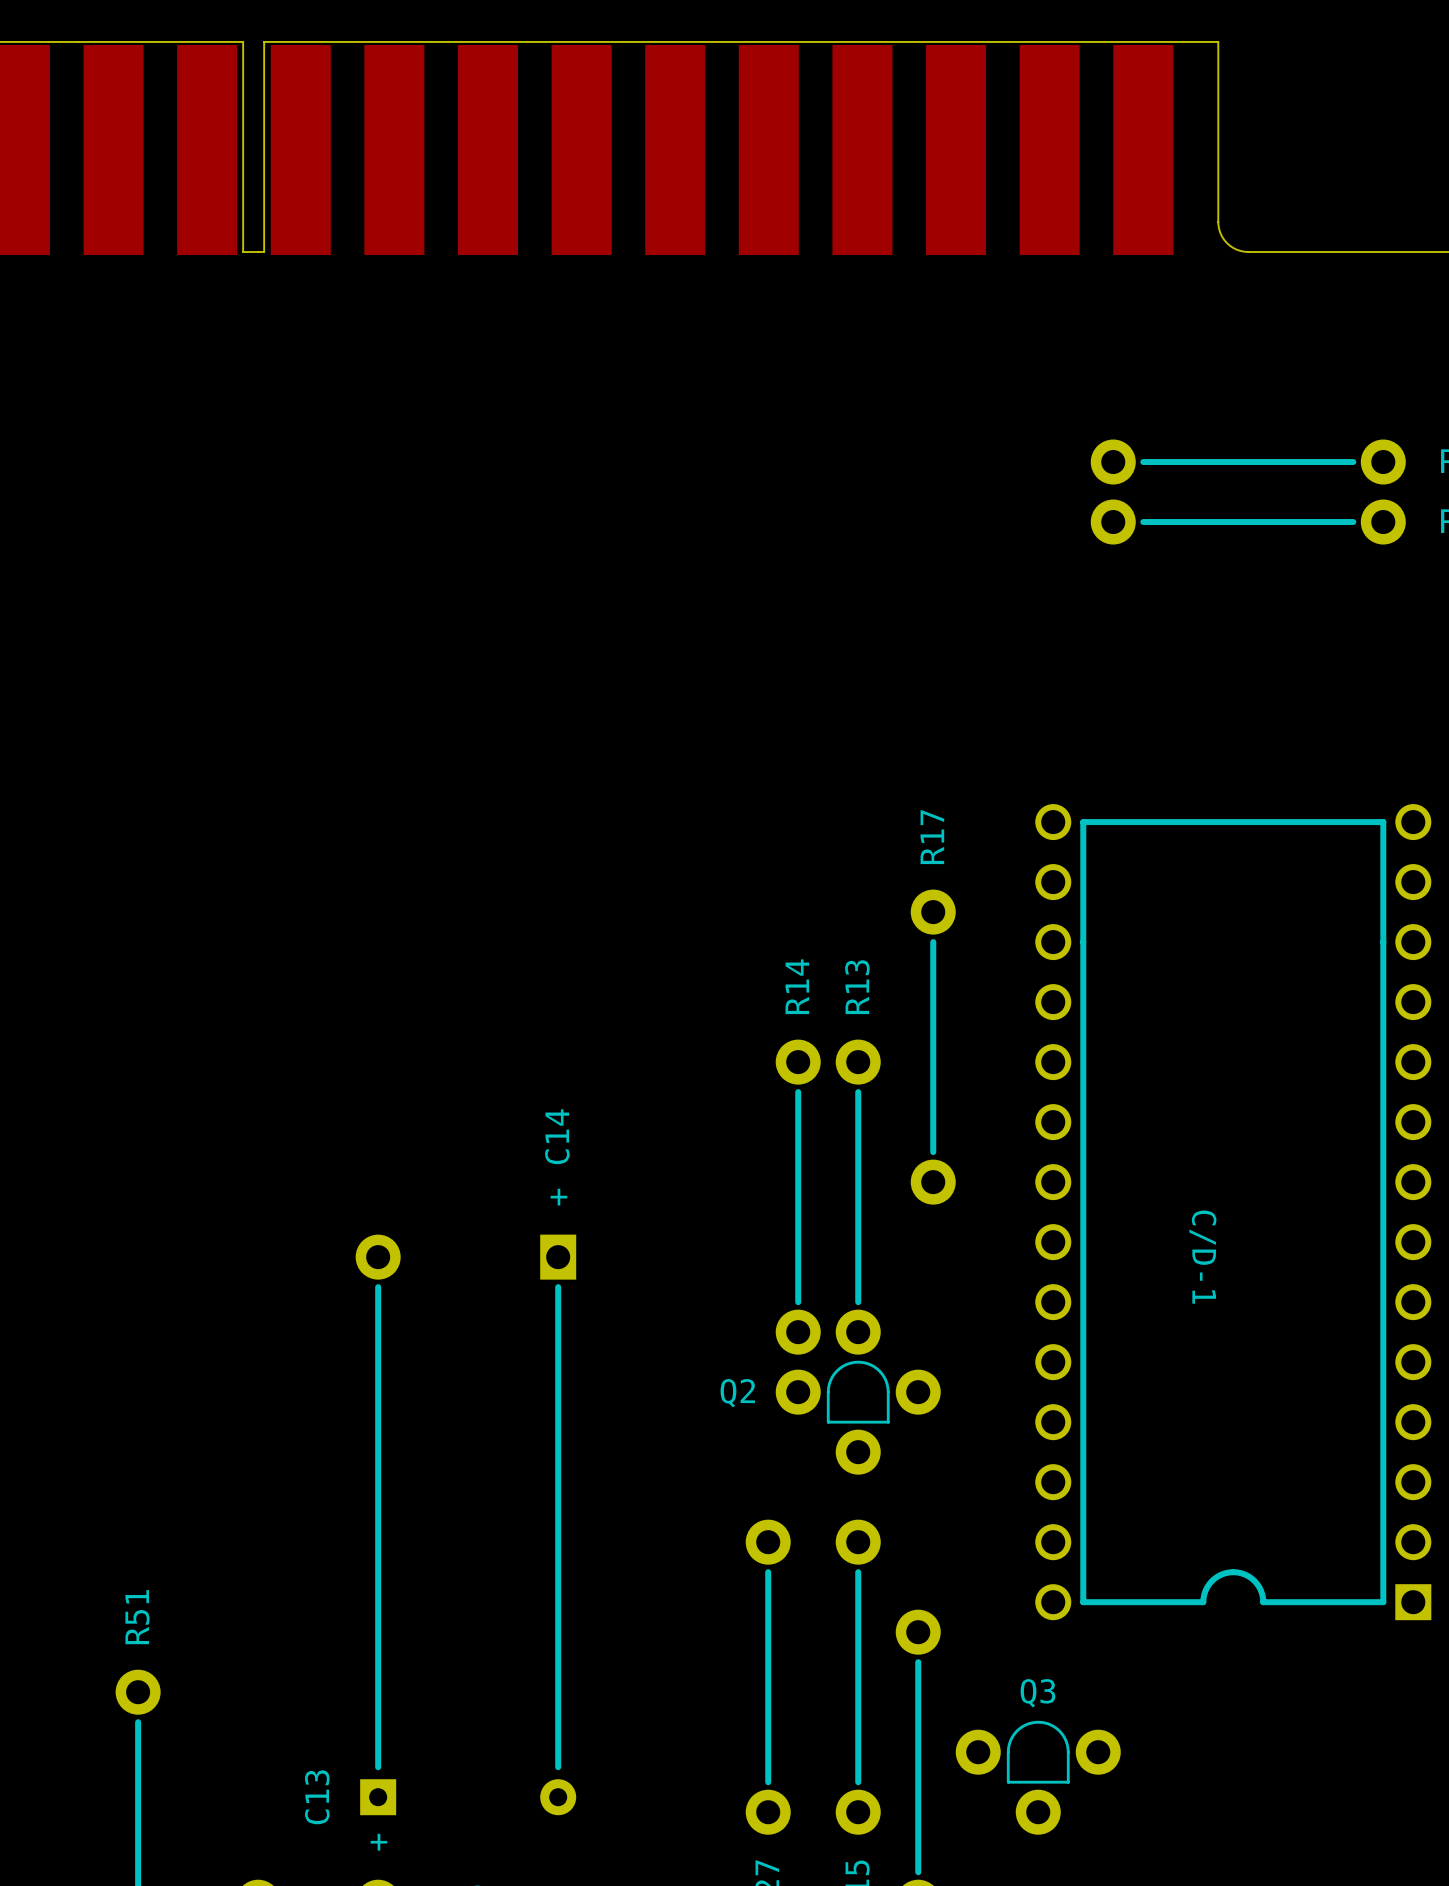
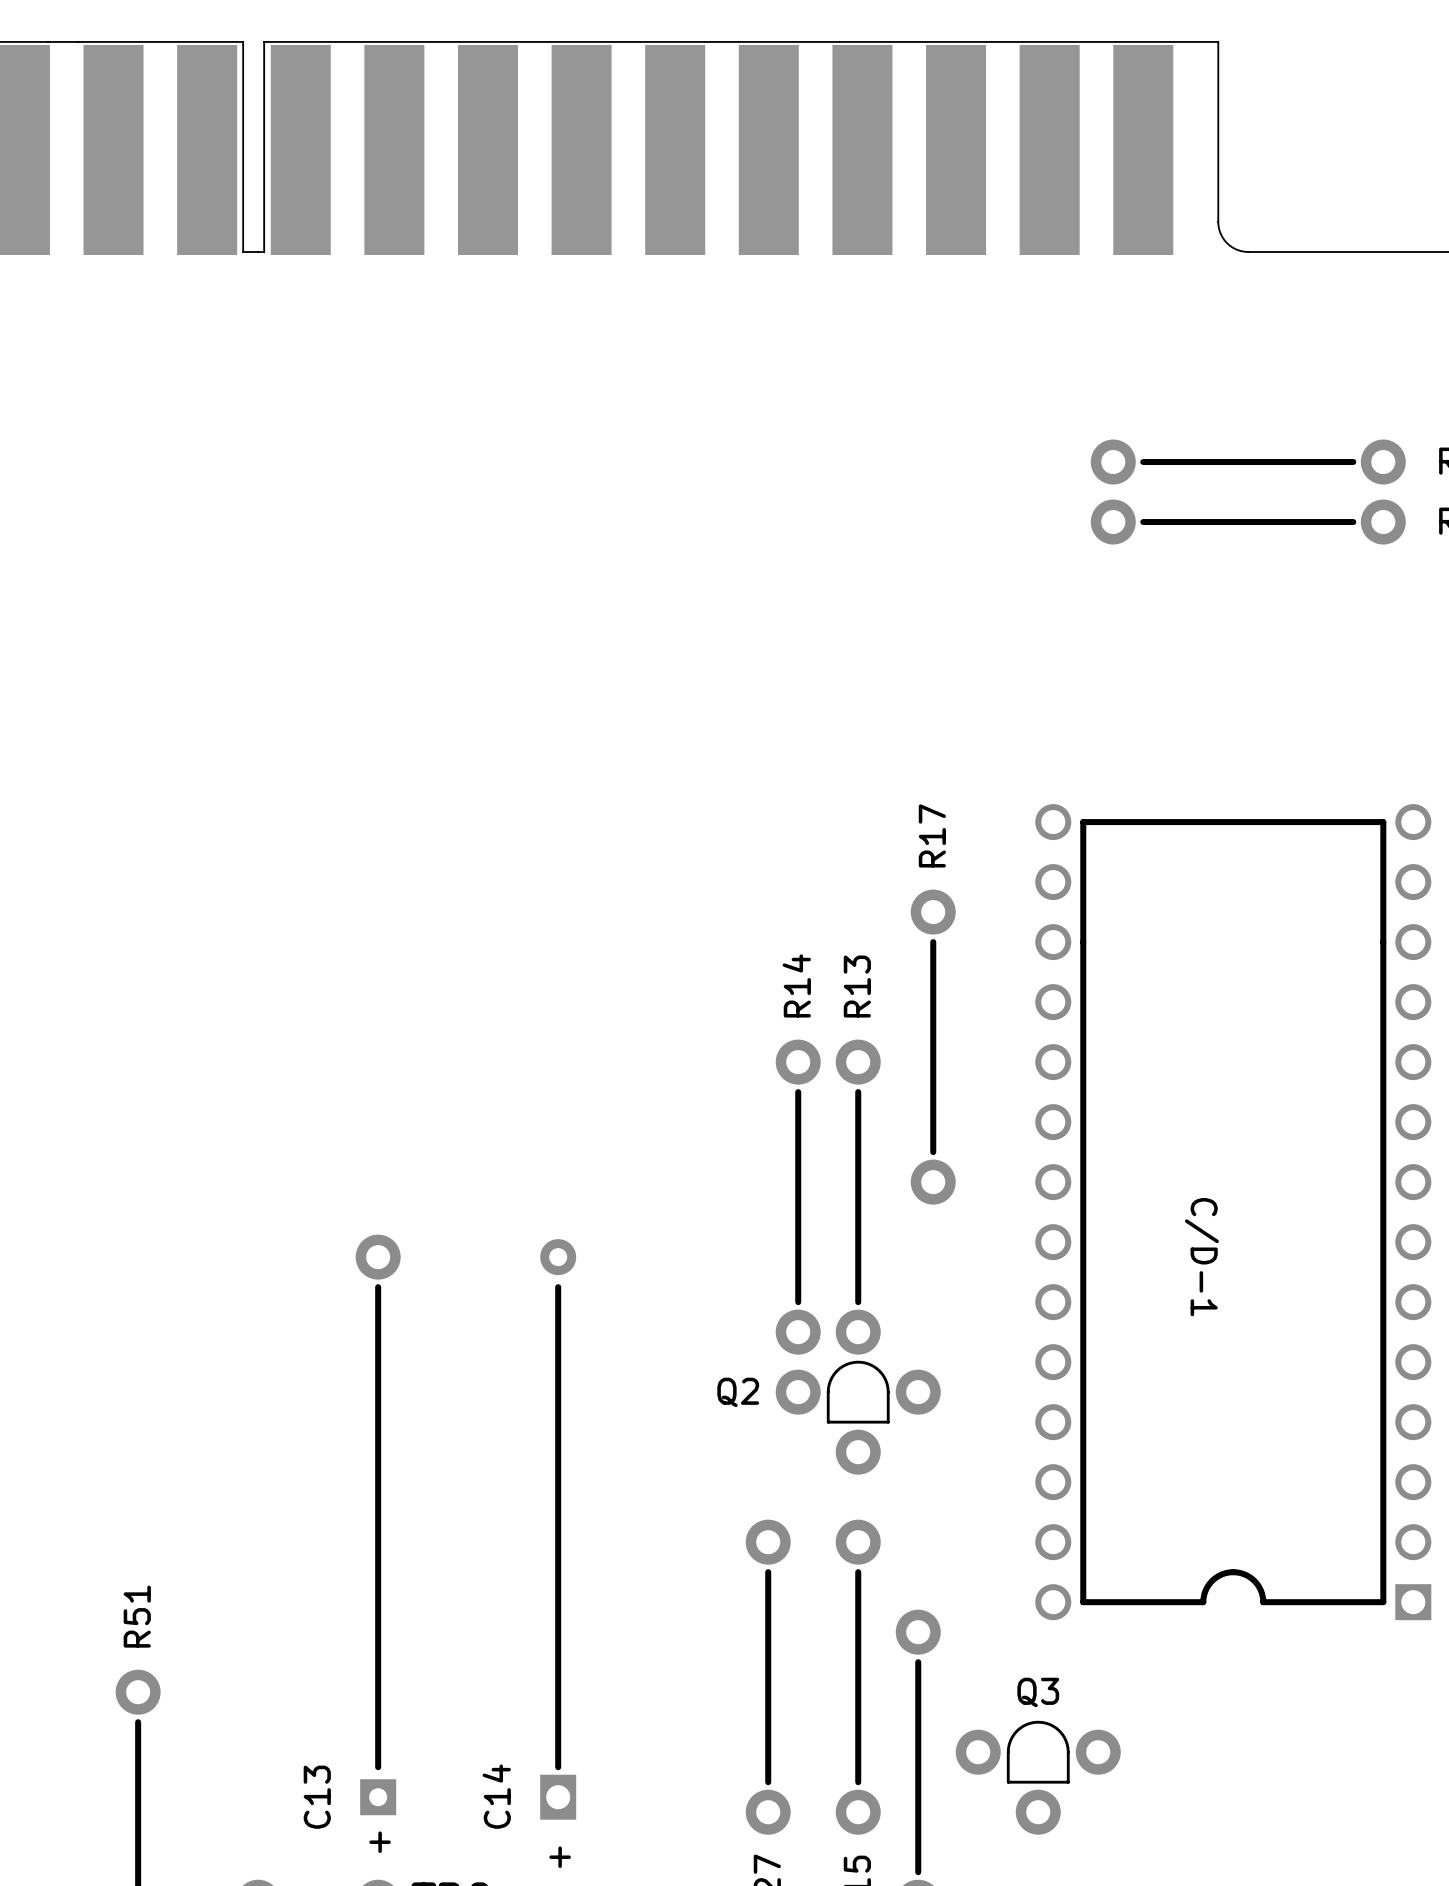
C14 name position: C14 (557, 1136) -> C14 (496, 1796)
C14 rotation: 0° (558, 1524) -> 180° (558, 1529)

